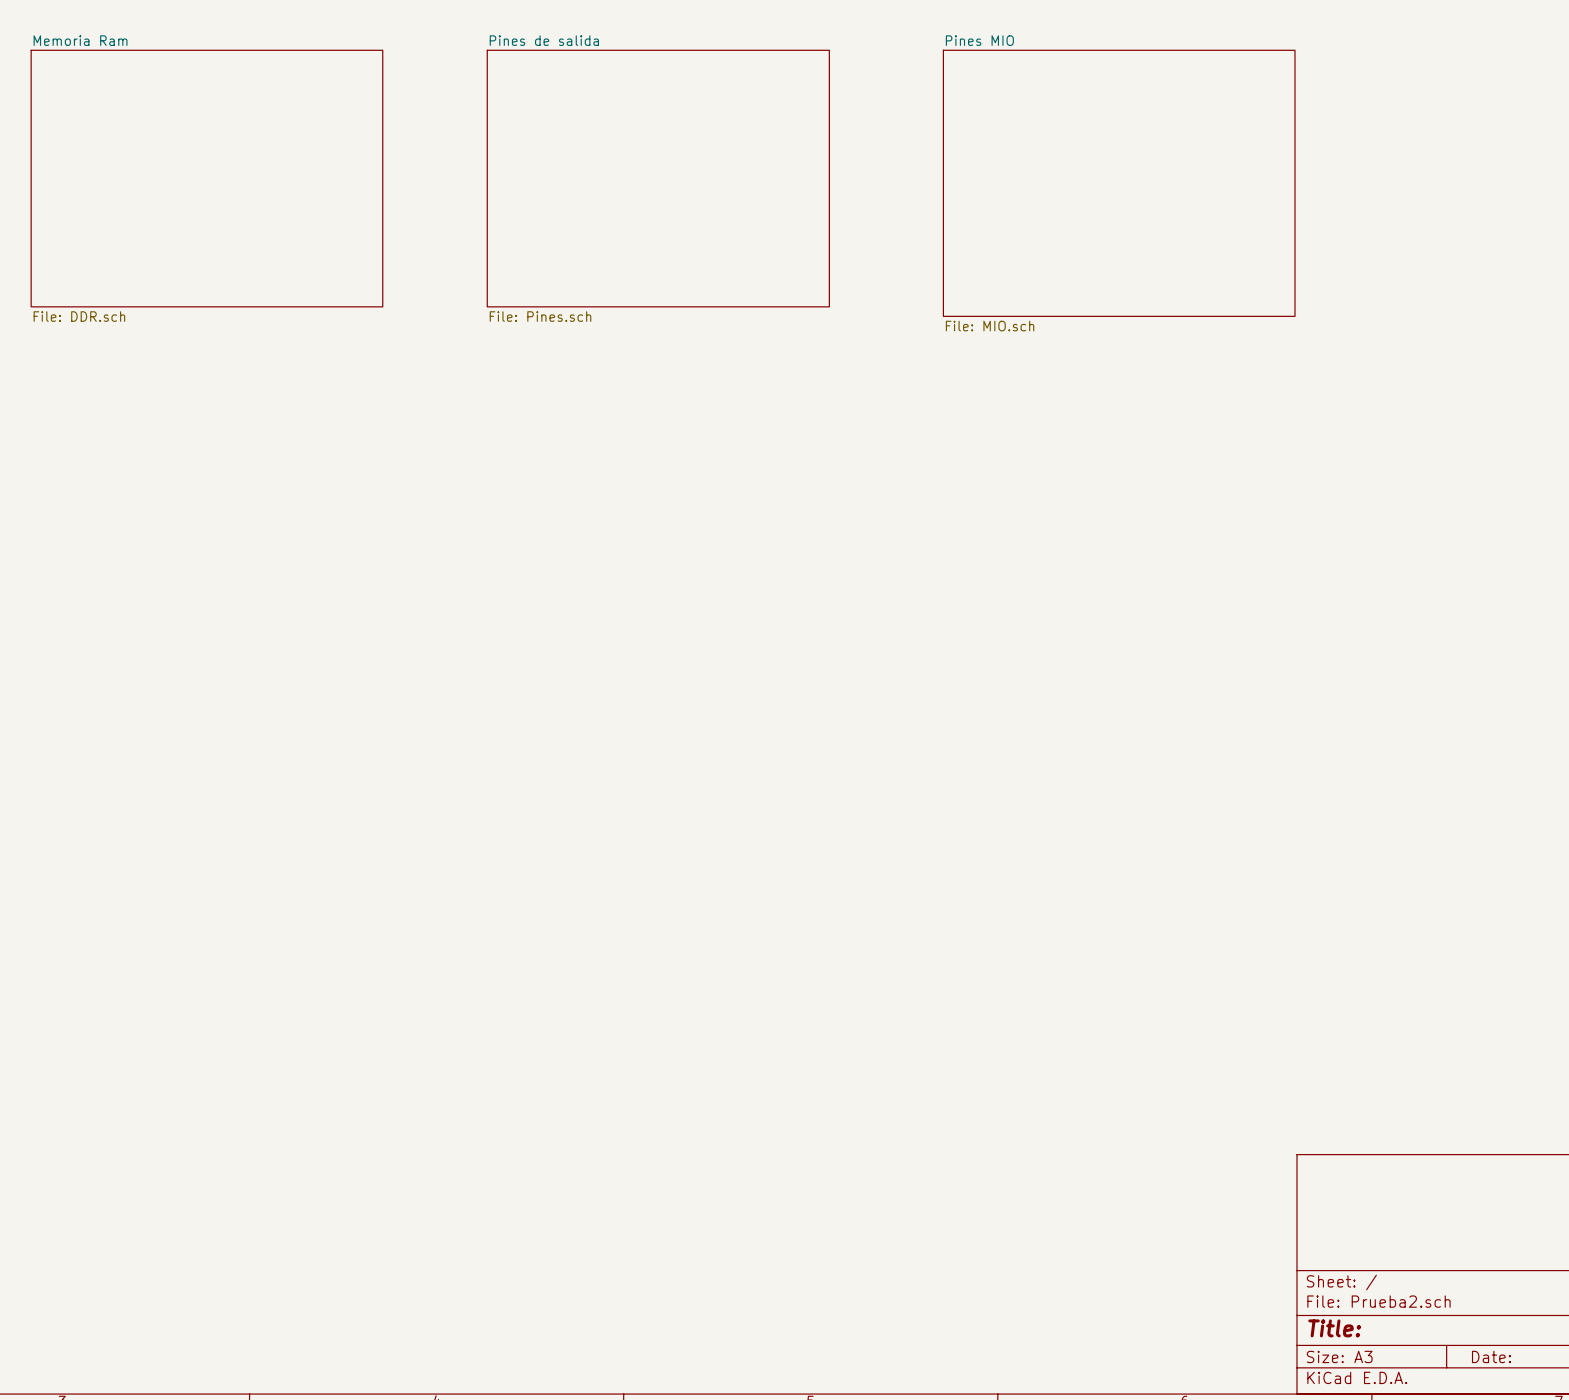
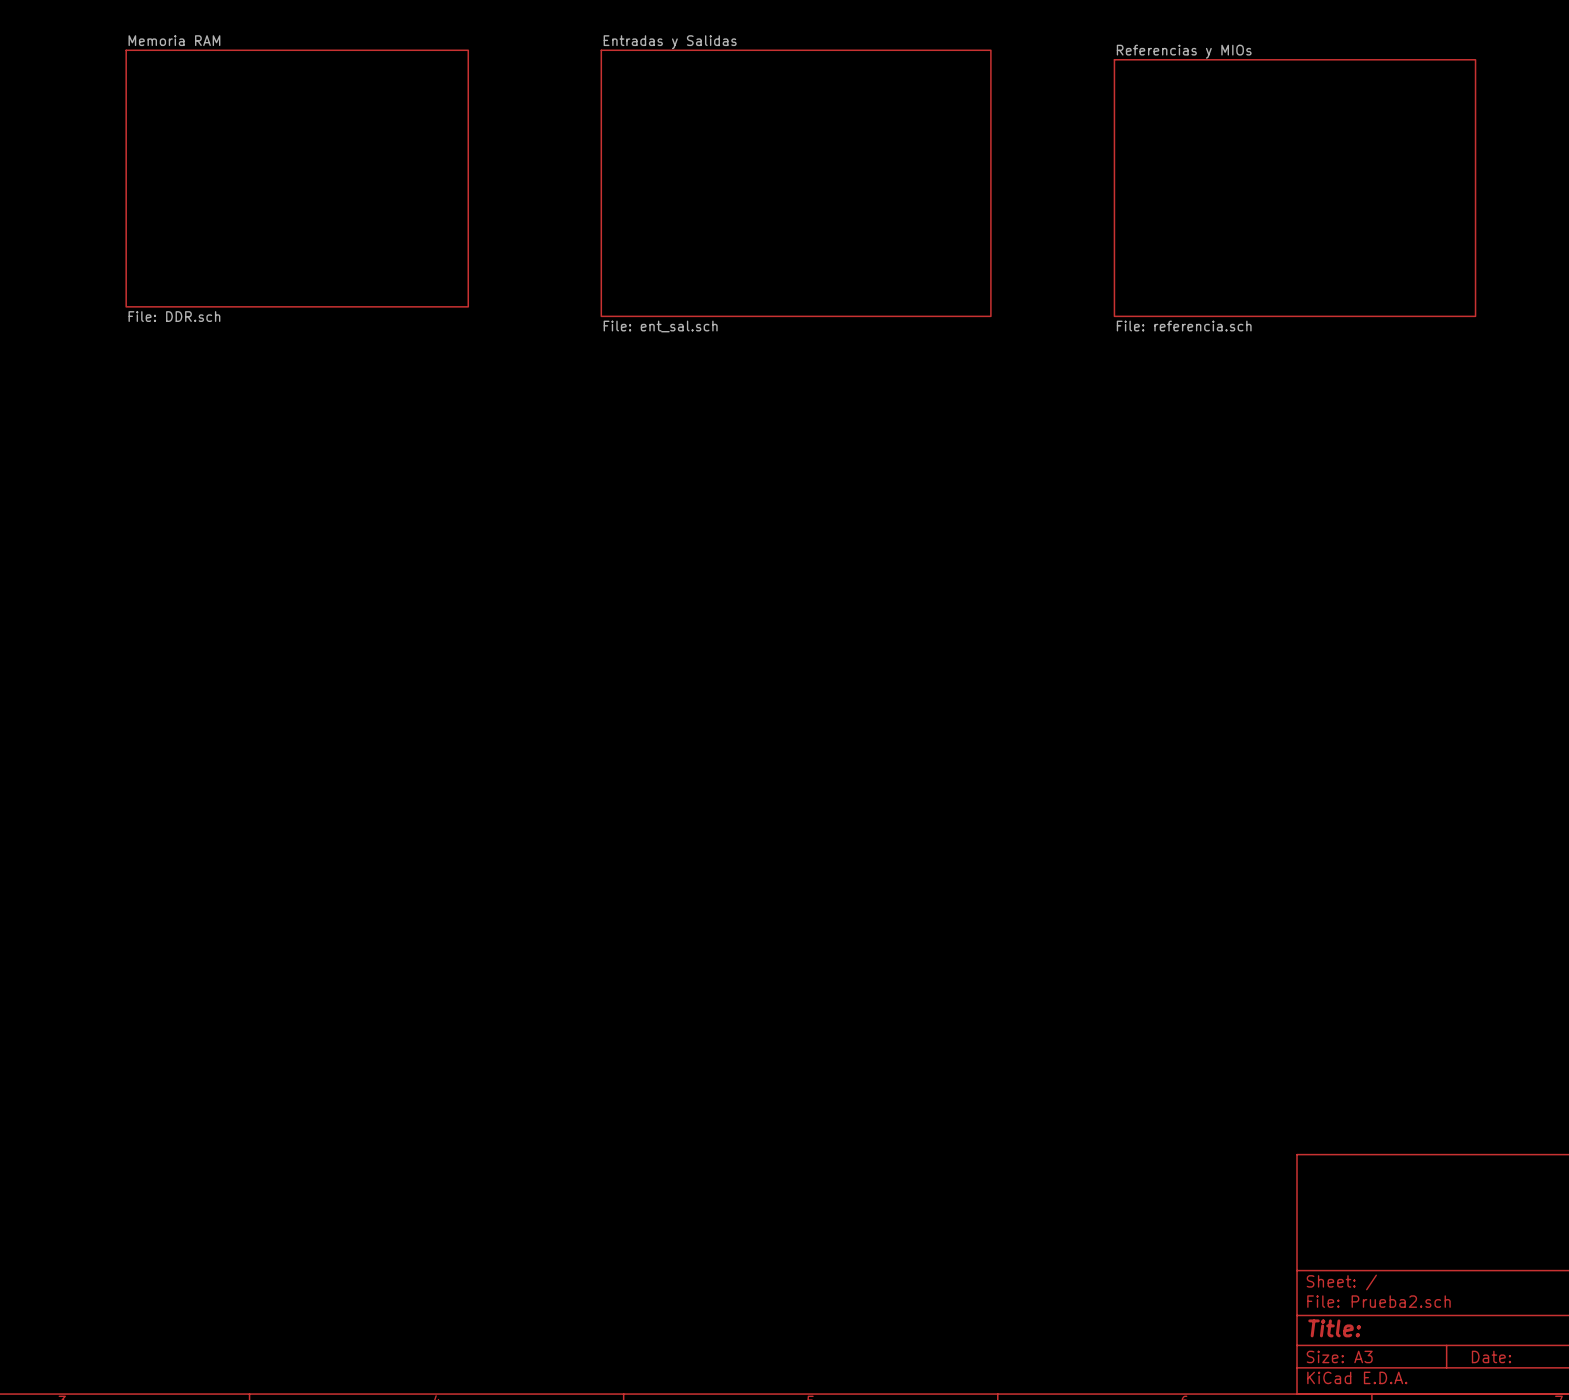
sheet Memoria Ram: File: DDR.sch (206, 178) -> none
sheet Memoria RAM: none -> File: DDR.sch (297, 178)
sheet Pines de salida: File: Pines.sch (658, 178) -> none
sheet Entradas y Salidas: none -> File: ent_sal.sch (796, 183)
sheet Pines MIO: File: MIO.sch (1119, 183) -> none
sheet Referencias y MIOs: none -> File: referencia.sch (1294, 188)

